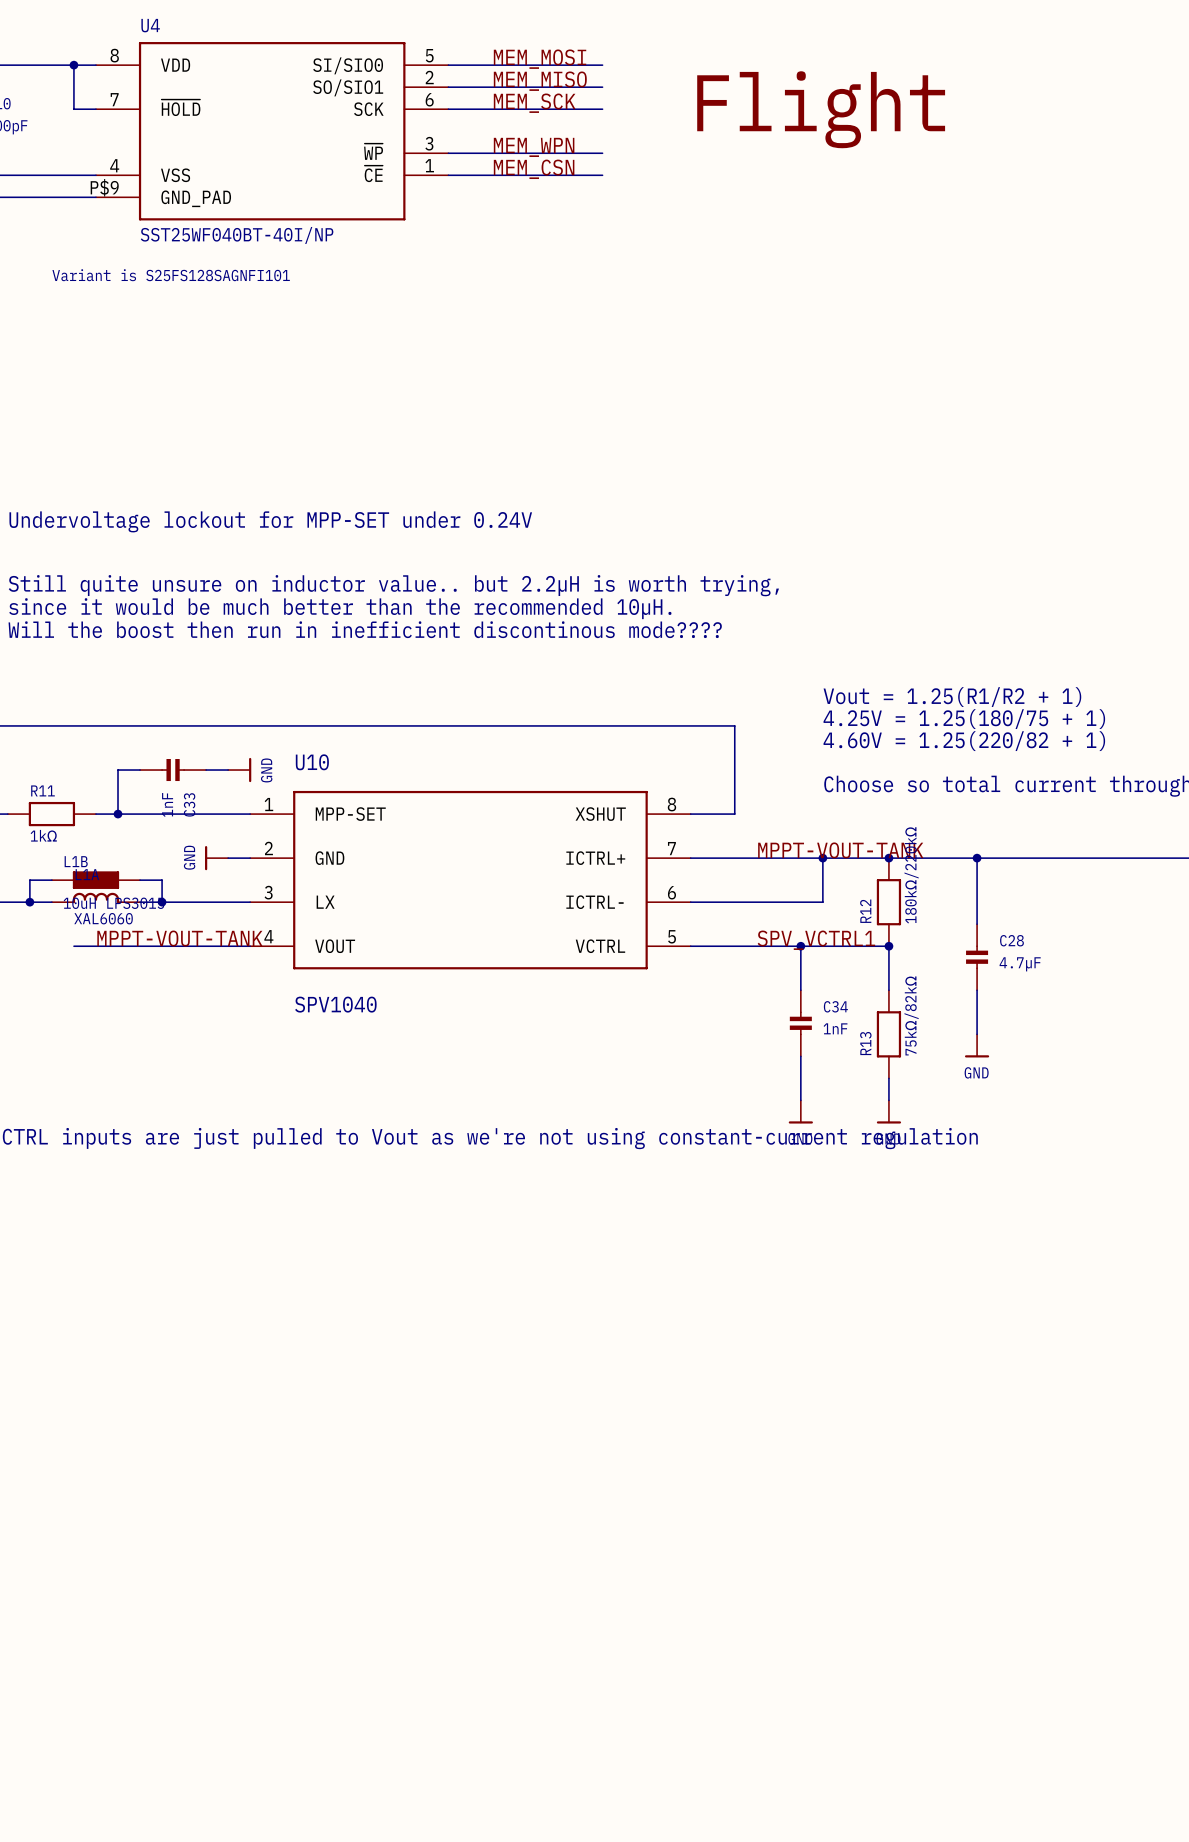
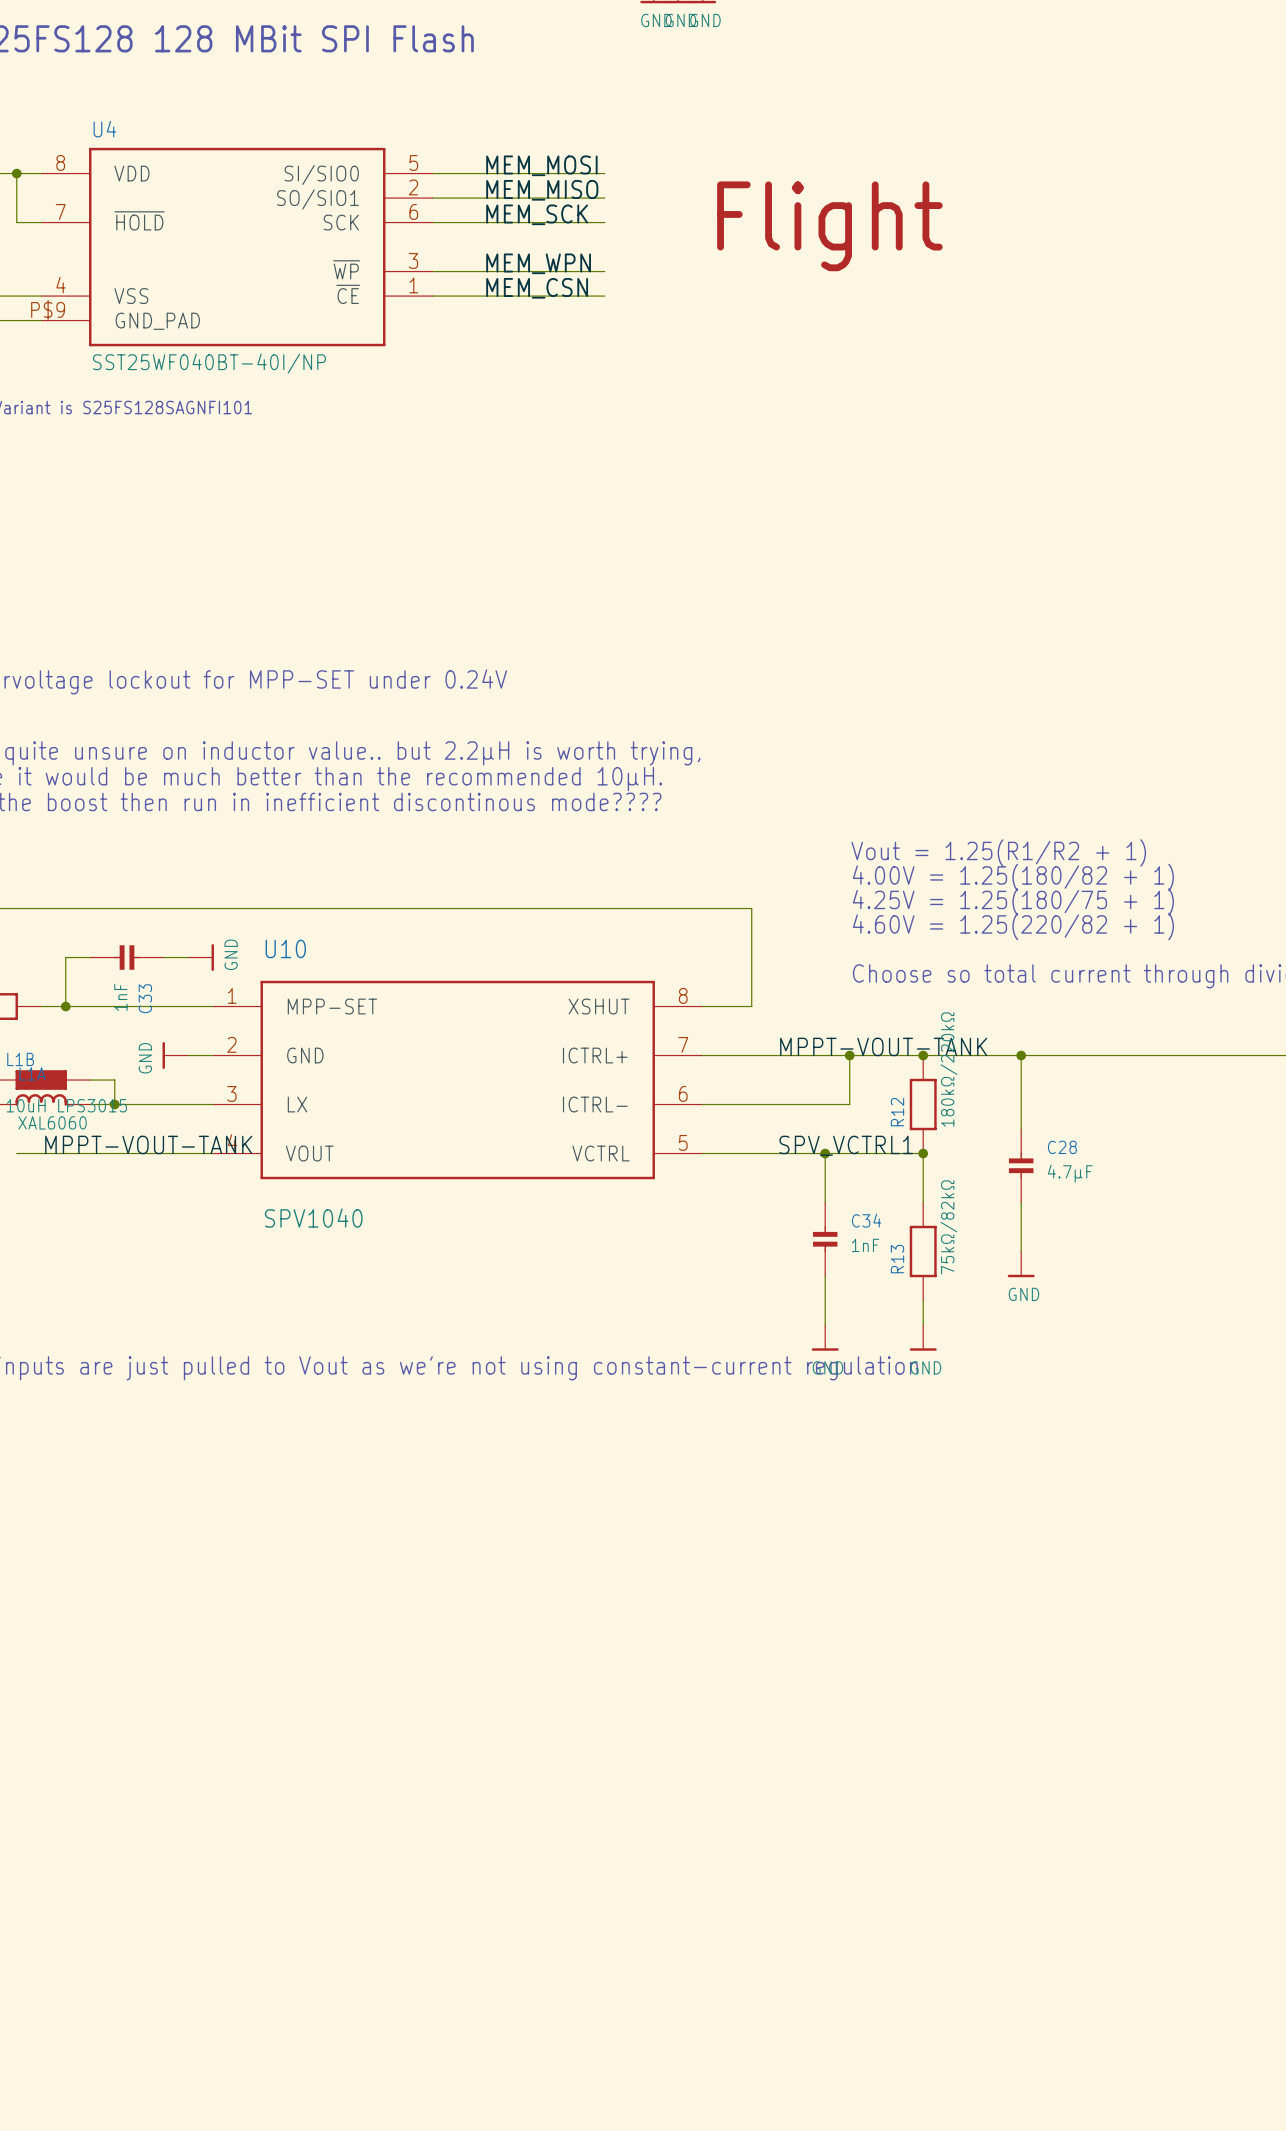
text: none -> Vout = 1.25(R1/R2 + 1) (998, 853)
text: Vout = 1.25(R1/R2 + 1) (952, 697) -> 4.00V = 1.25(180/82 + 1) (1013, 877)

